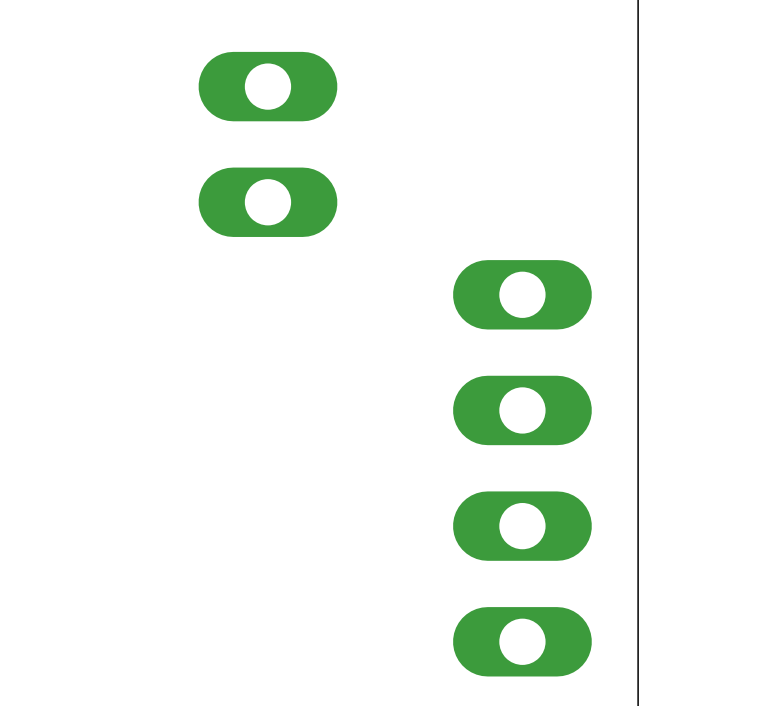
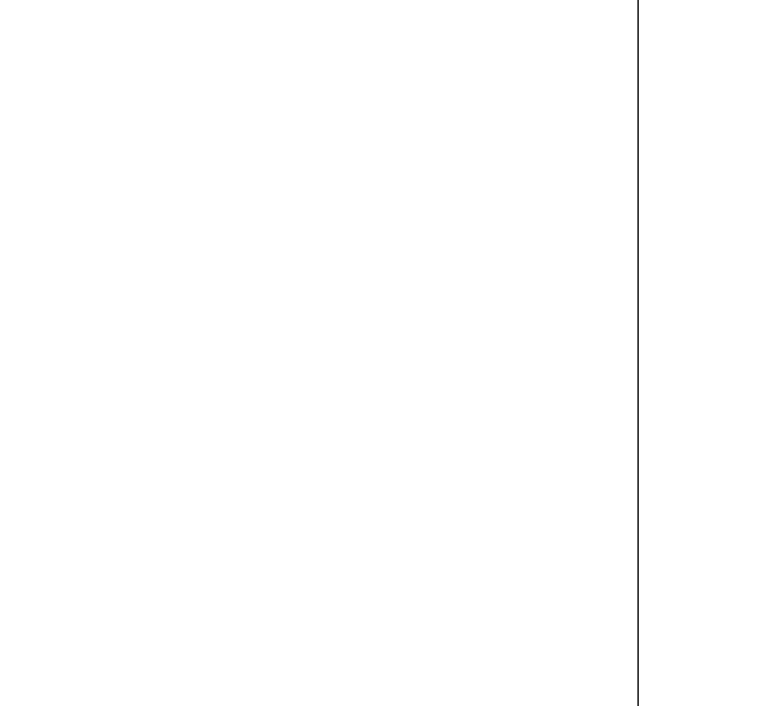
part: (267, 144) -> none
part: (522, 468) -> none

